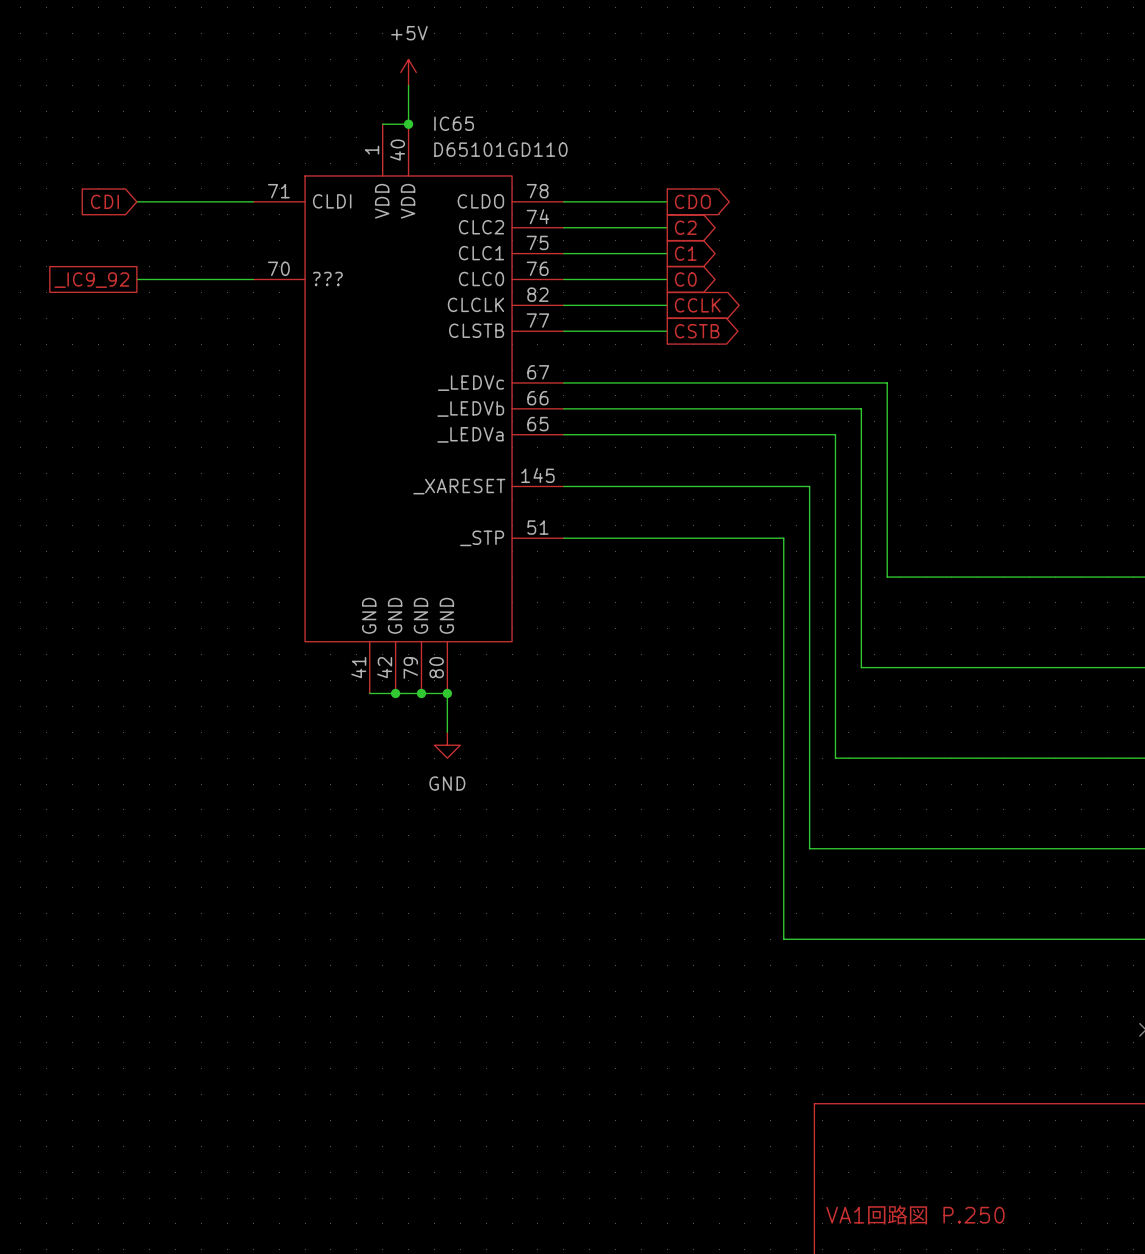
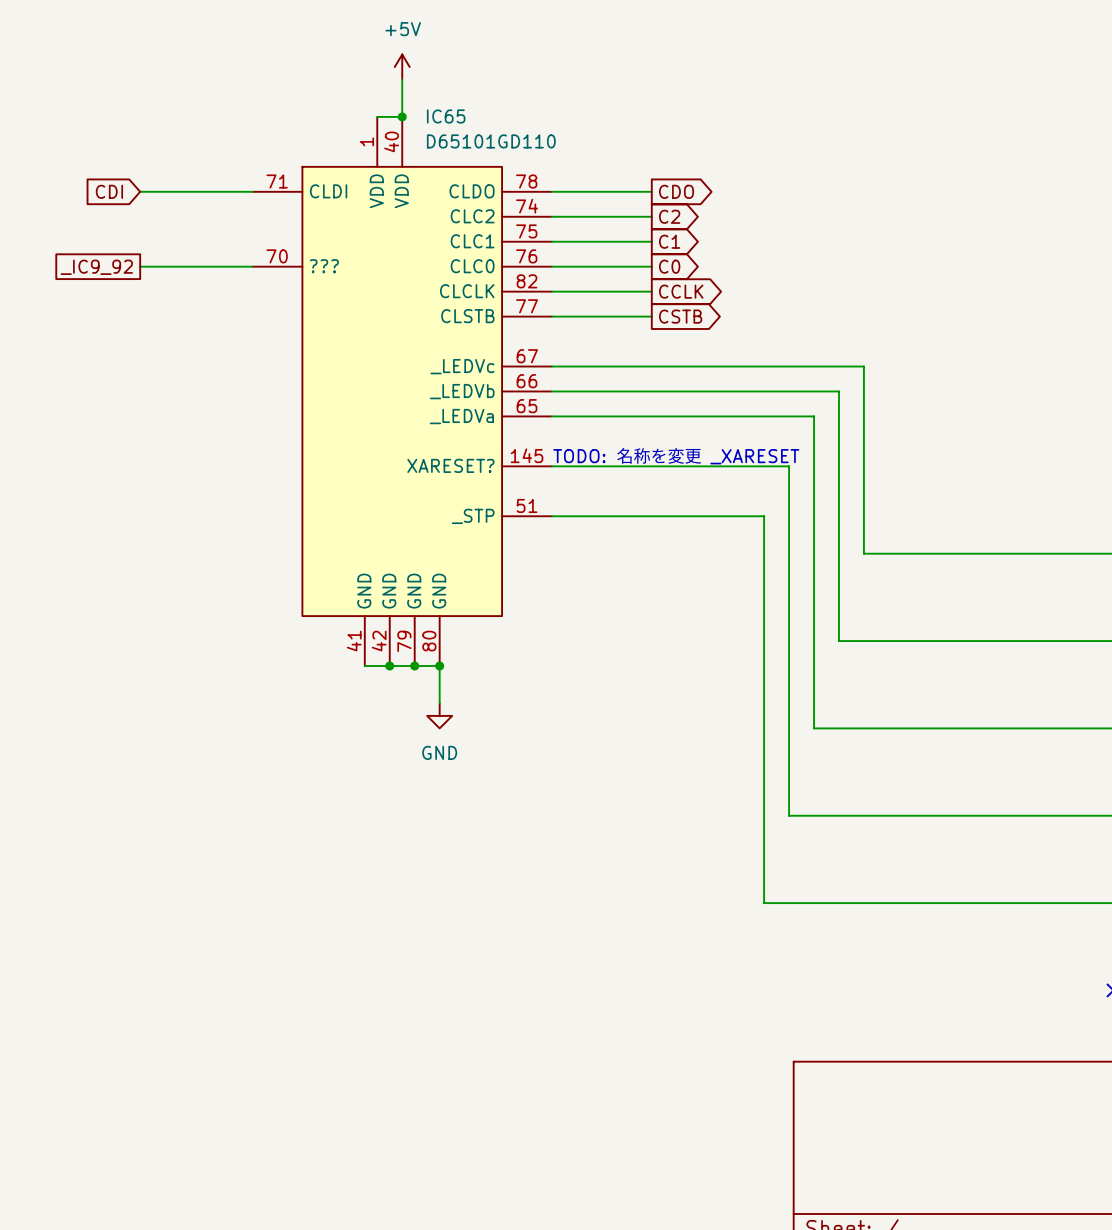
text: none -> TODO: 名称を変更 _XARESET (676, 455)
IC65 pin name: _XARESET (459, 486) -> XARESET? (450, 465)
title block: VA1回路図 P.250 (915, 1214) -> none

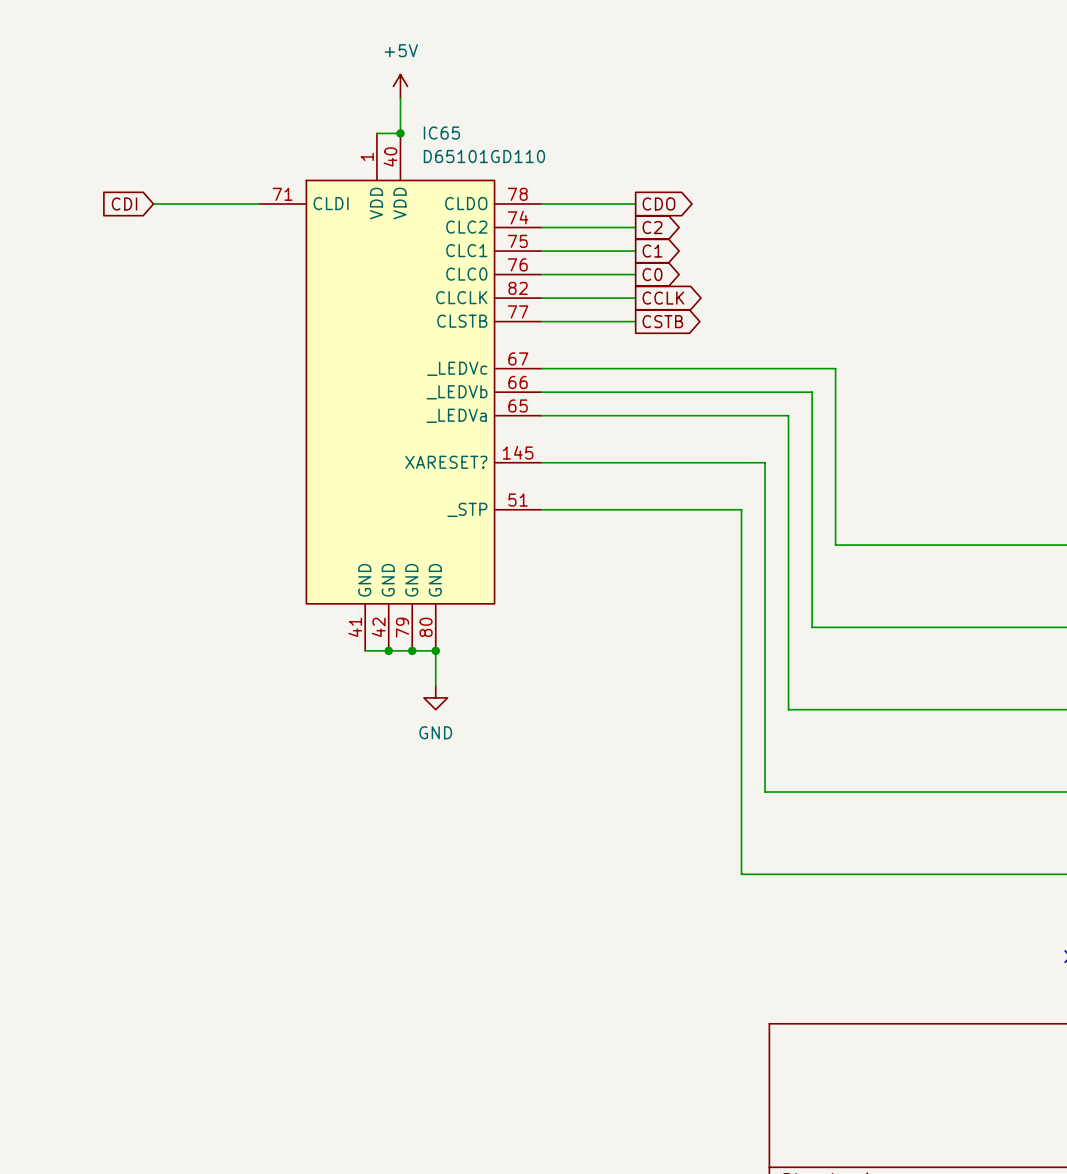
IC65 symbol: [252, 116, 552, 667] -> [259, 133, 542, 651]
wire: (140, 266) (252, 266) -> none
global label: _IC9_92 (96, 267) -> none
text: TODO: 名称を変更 _XARESET (676, 455) -> none

